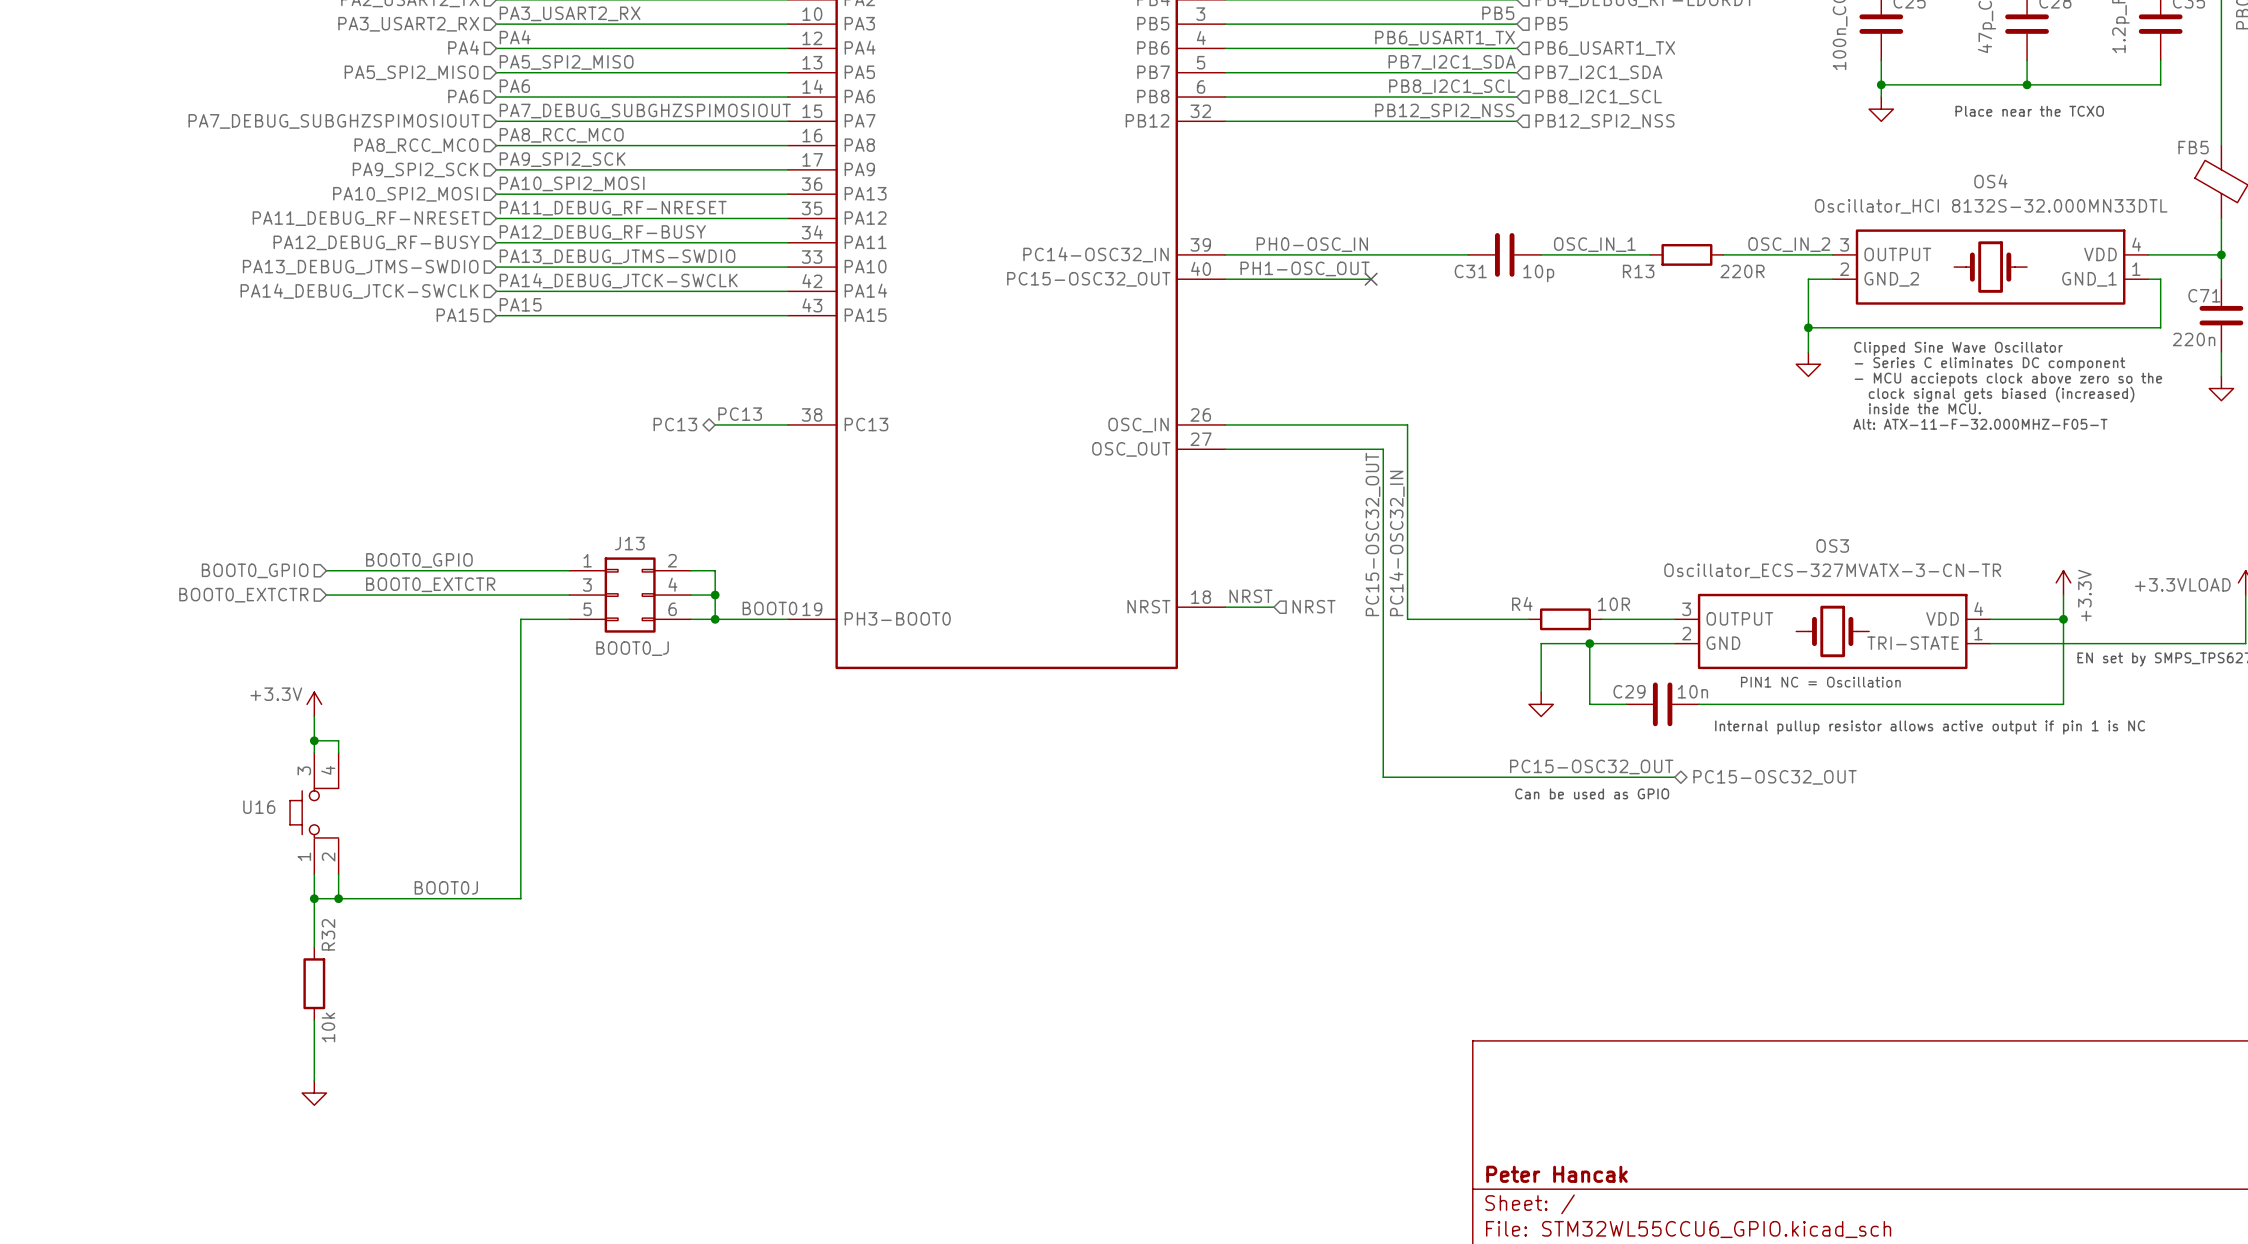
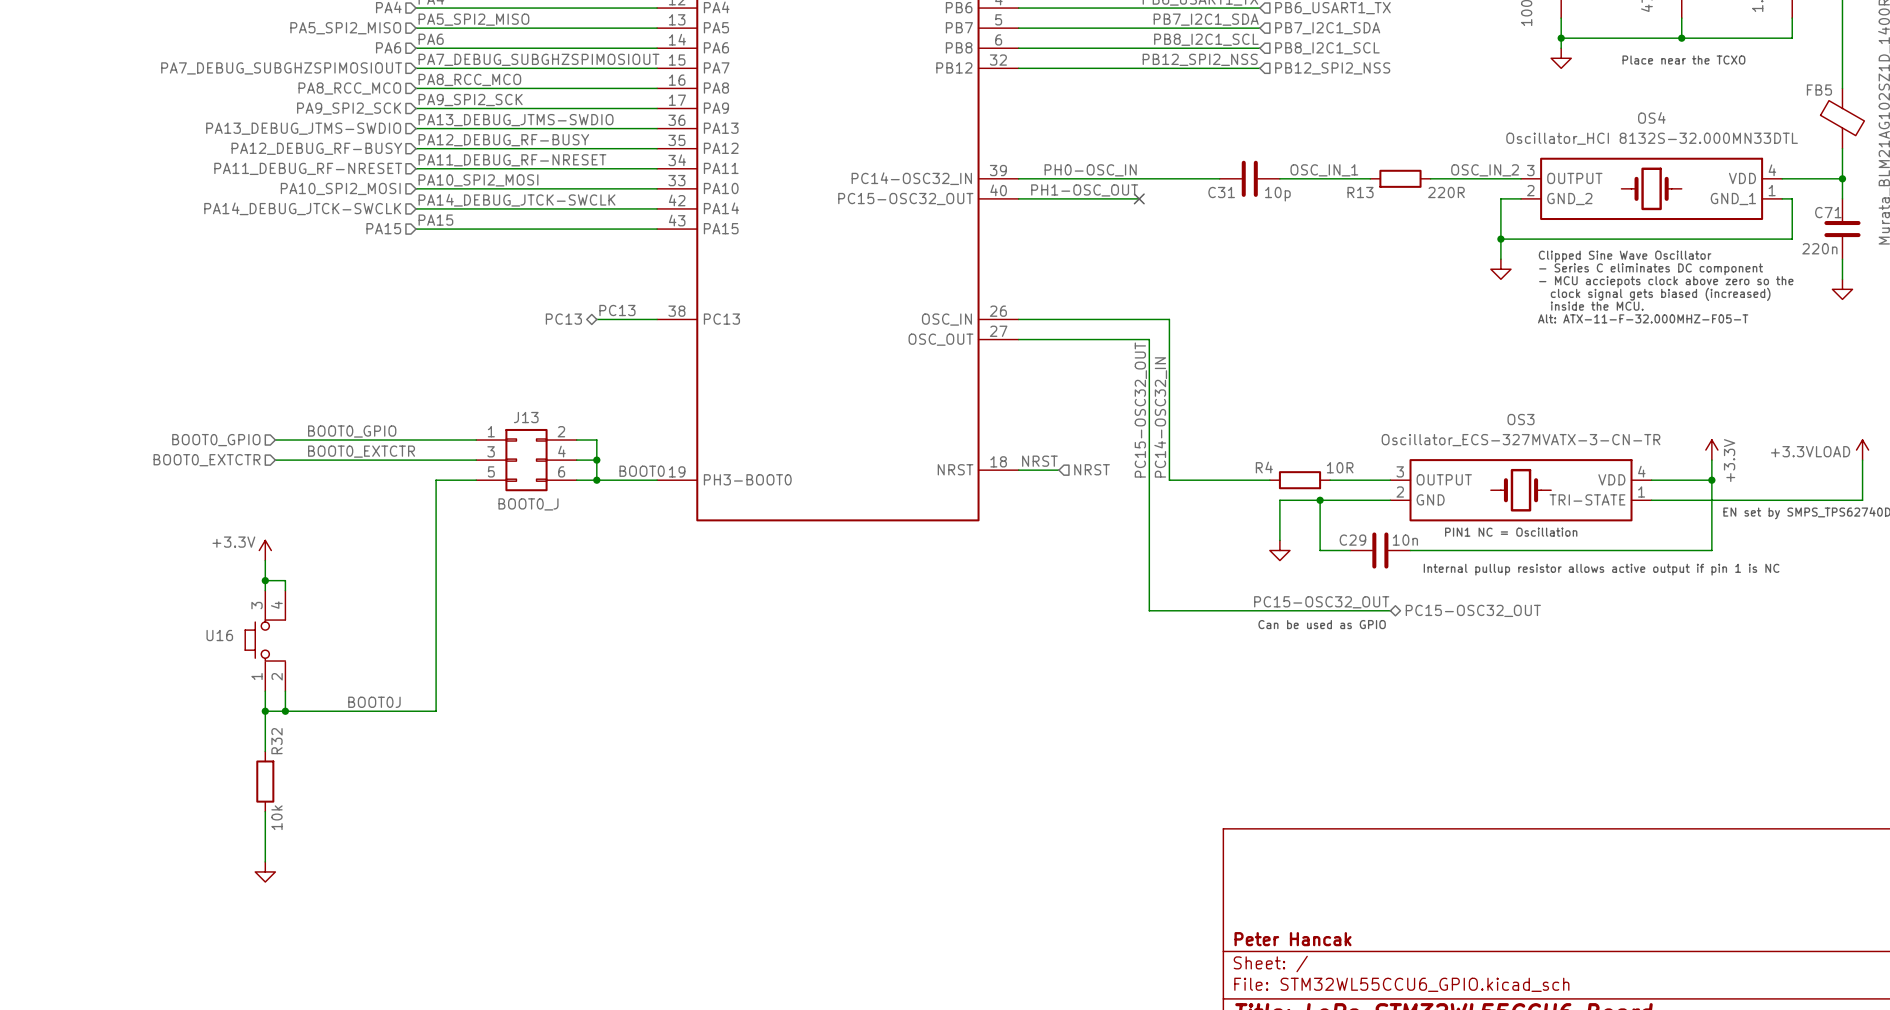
label: PA10_SPI2_MOSI (572, 183) -> PA13_DEBUG_JTMS-SWDIO (516, 120)
hierarchical label: PA10_SPI2_MOSI (405, 194) -> PA13_DEBUG_JTMS-SWDIO (303, 128)
label: PA11_DEBUG_RF-NRESET (613, 208) -> PA12_DEBUG_RF-BUSY (503, 140)
hierarchical label: PA11_DEBUG_RF-NRESET (366, 218) -> PA12_DEBUG_RF-BUSY (316, 148)
label: PA12_DEBUG_RF-BUSY (602, 232) -> PA11_DEBUG_RF-NRESET (512, 160)
hierarchical label: PA12_DEBUG_RF-BUSY (376, 242) -> PA11_DEBUG_RF-NRESET (308, 168)
label: PA13_DEBUG_JTMS-SWDIO (617, 256) -> PA10_SPI2_MOSI (478, 180)
hierarchical label: PA13_DEBUG_JTMS-SWDIO (360, 267) -> PA10_SPI2_MOSI (340, 188)

